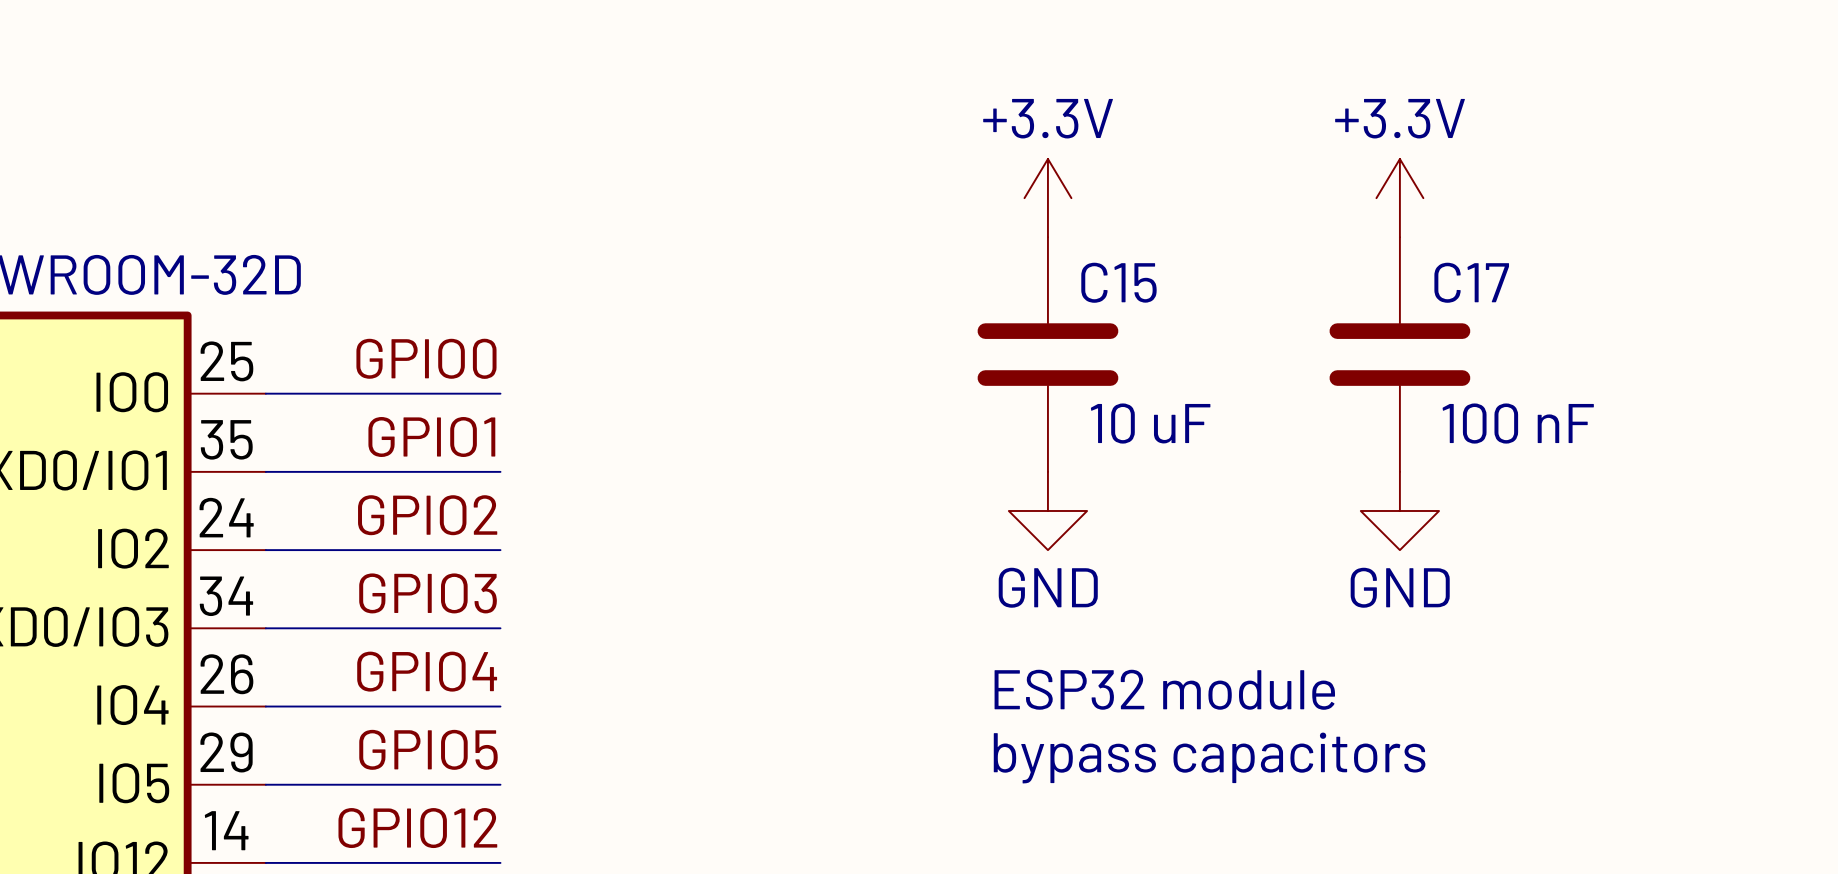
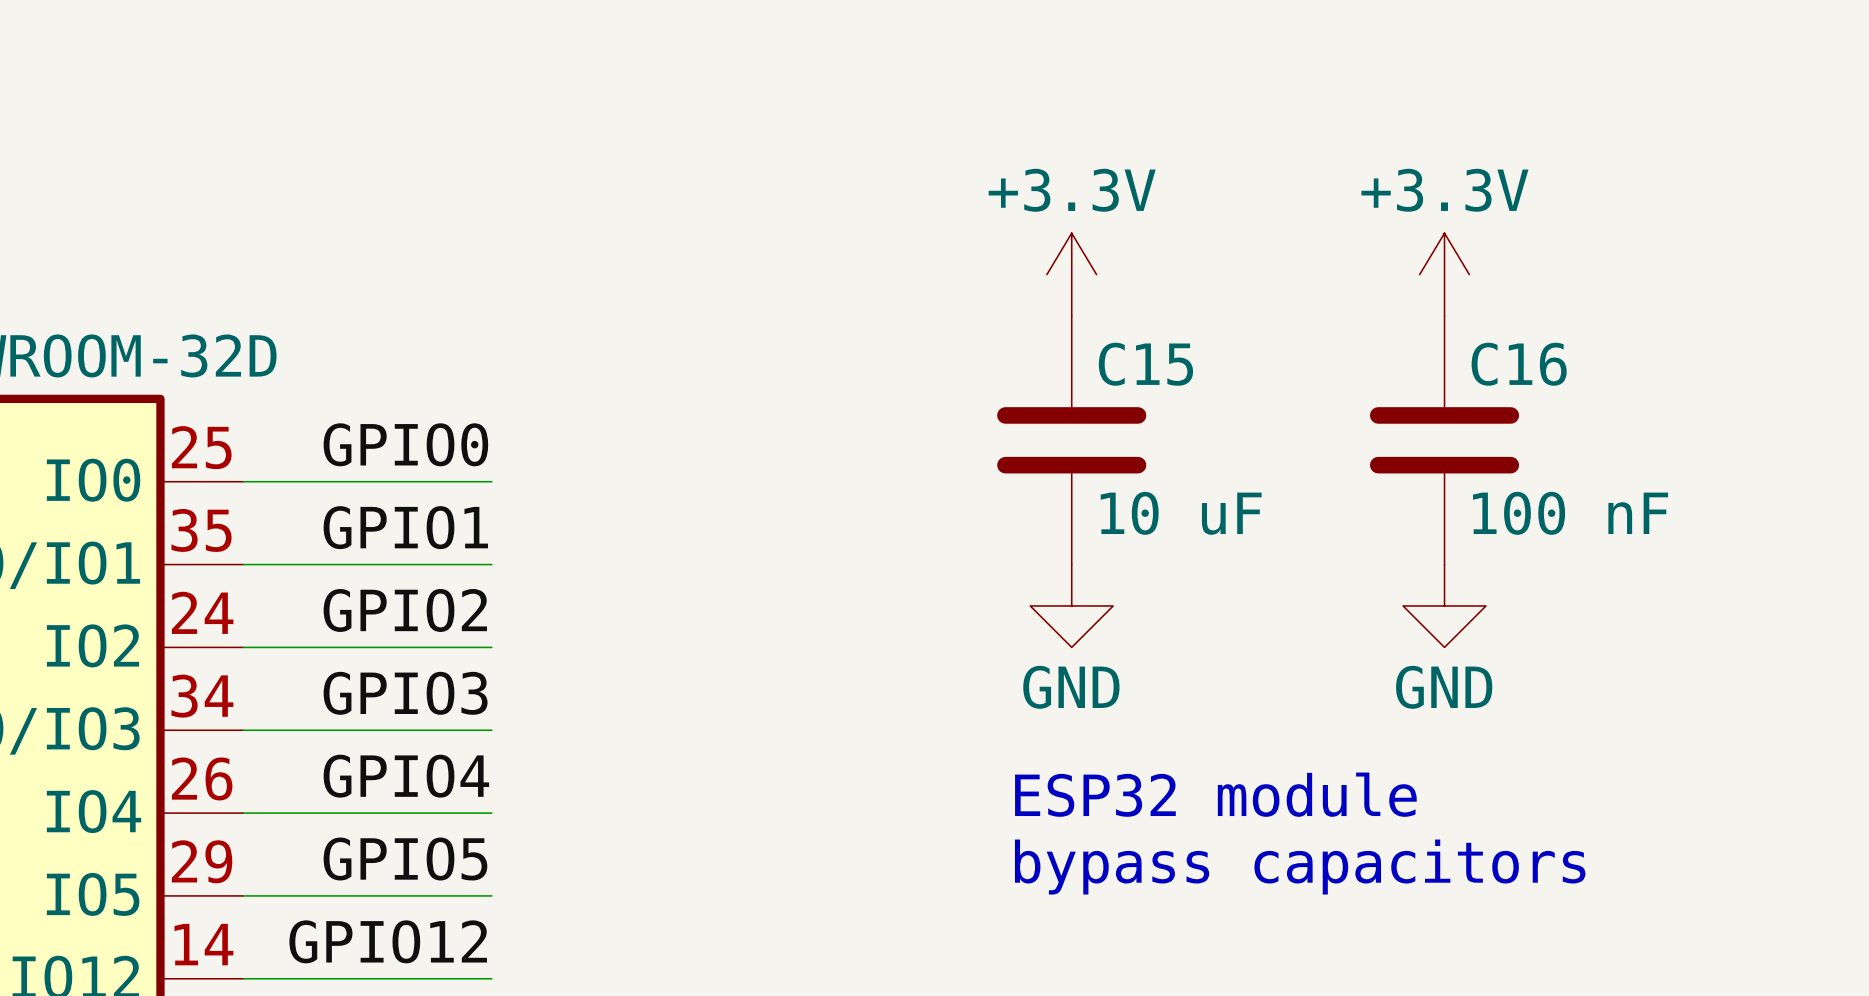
C17 name: C17 (1471, 282) -> C16 (1519, 364)

